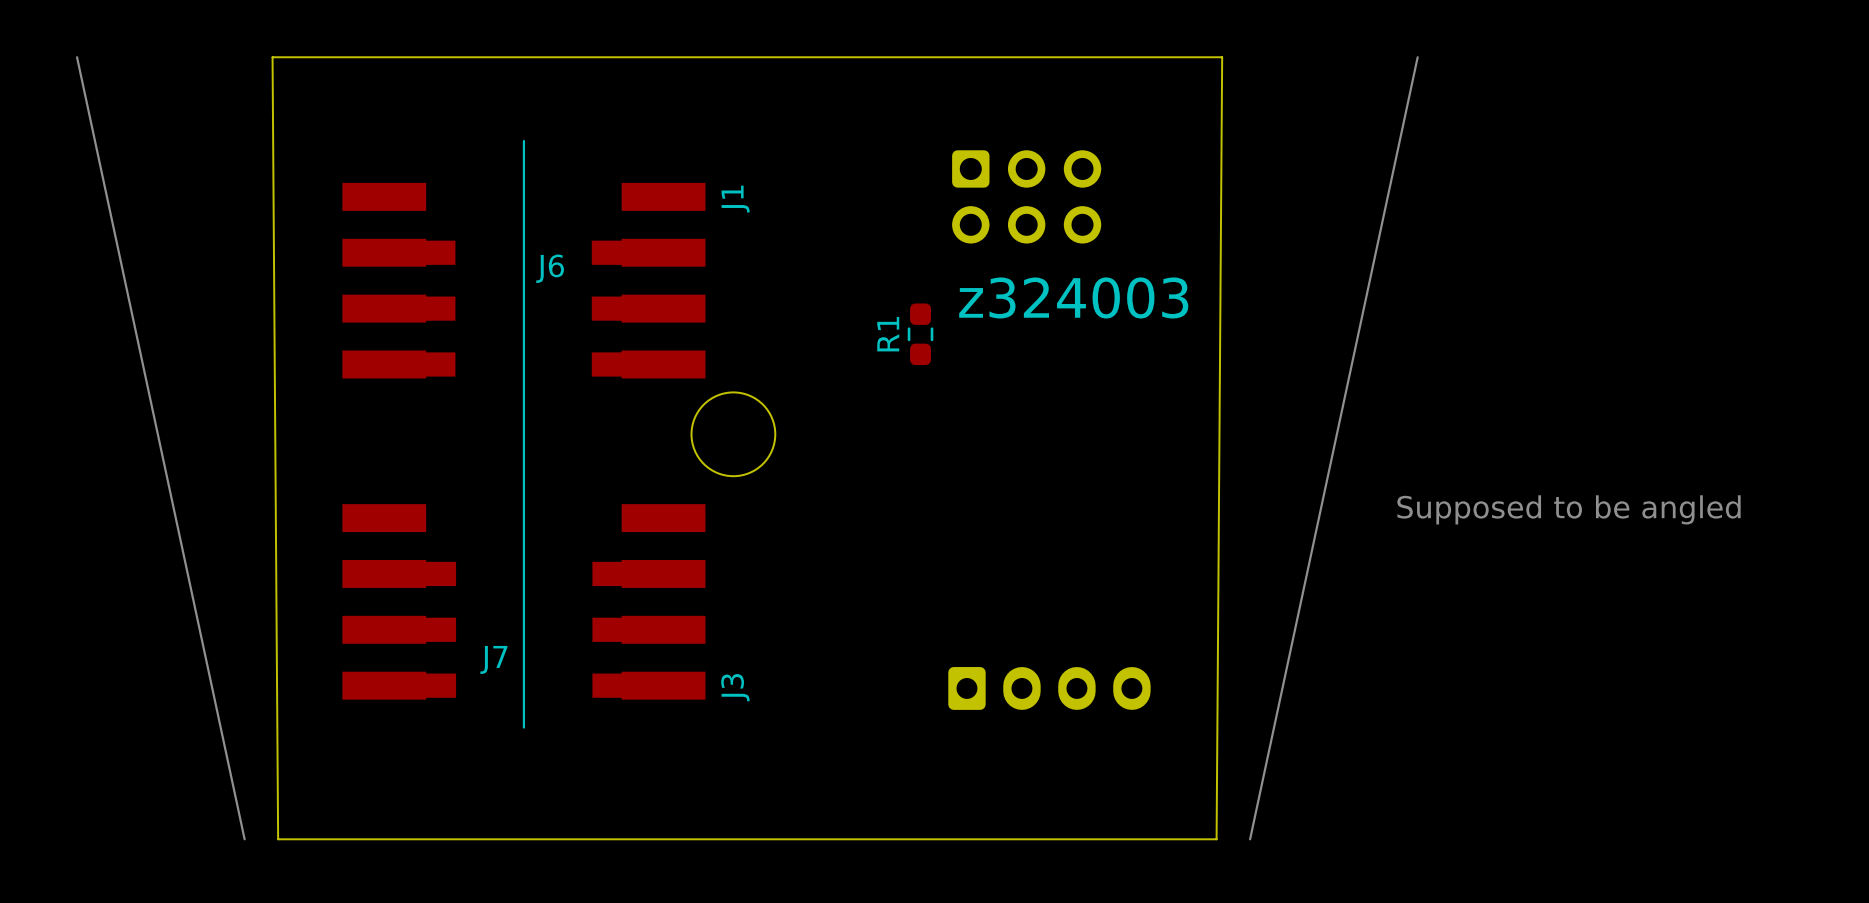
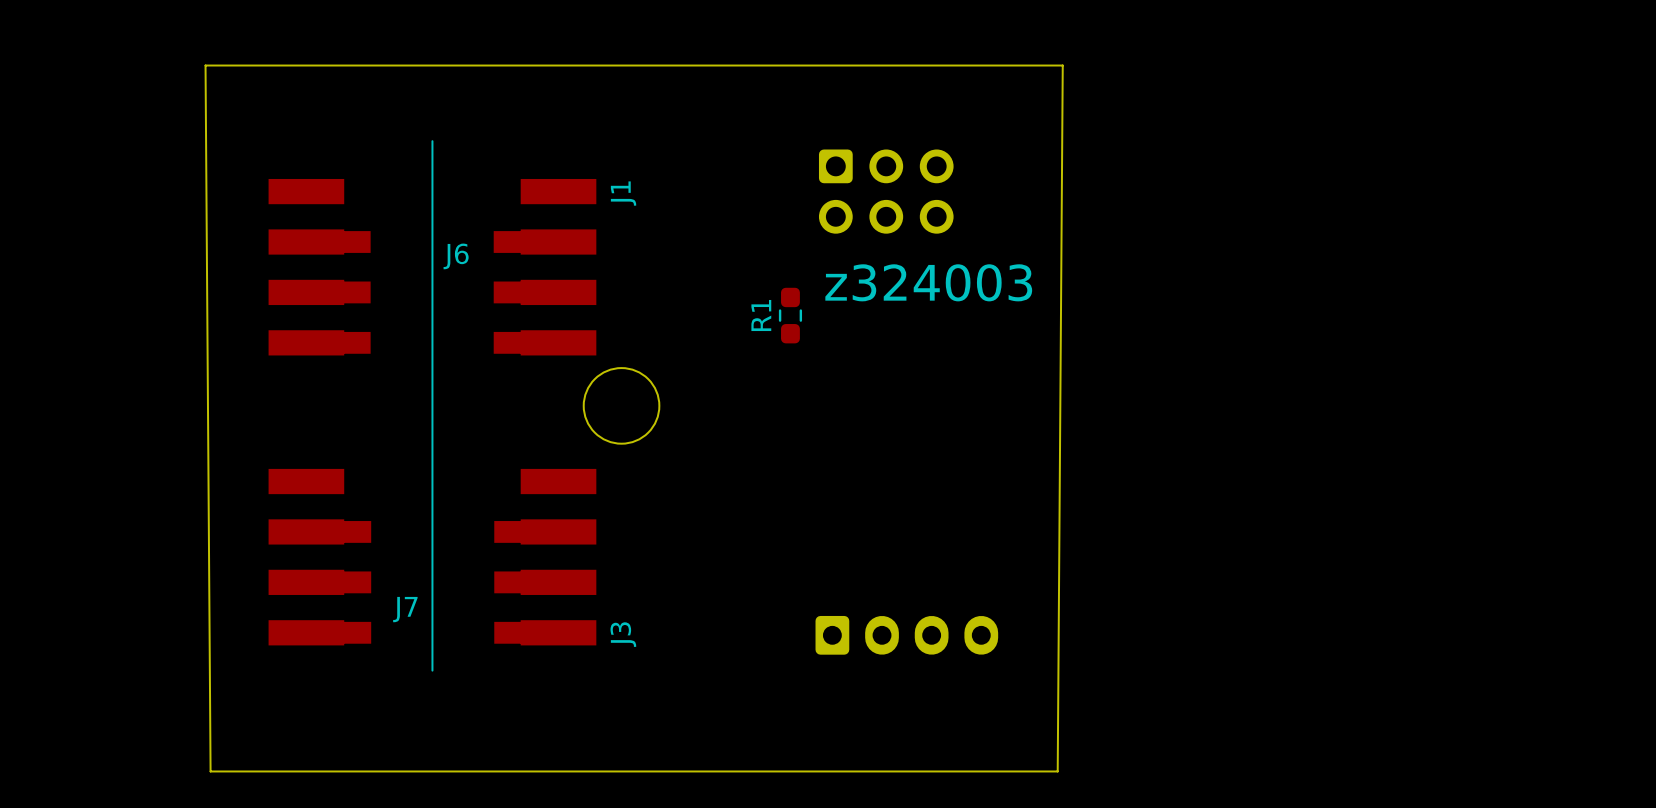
line: (77, 57) (244, 839) -> none
line: (1417, 57) (1250, 839) -> none
text: Supposed to be angled (1568, 509) -> none

